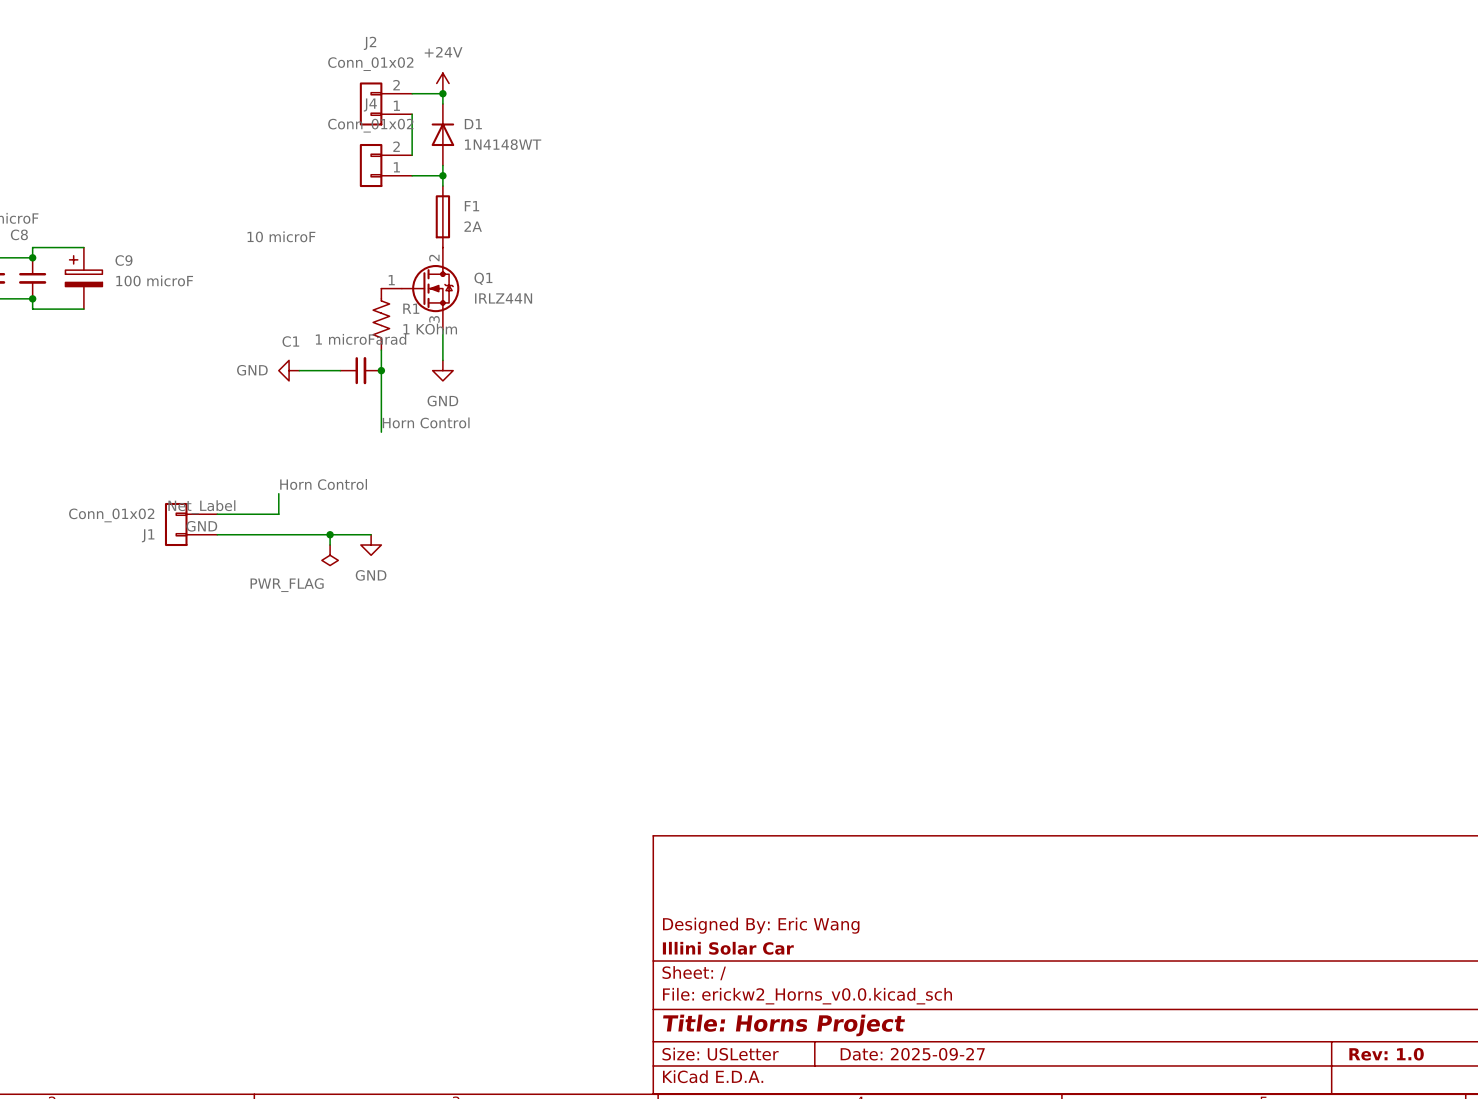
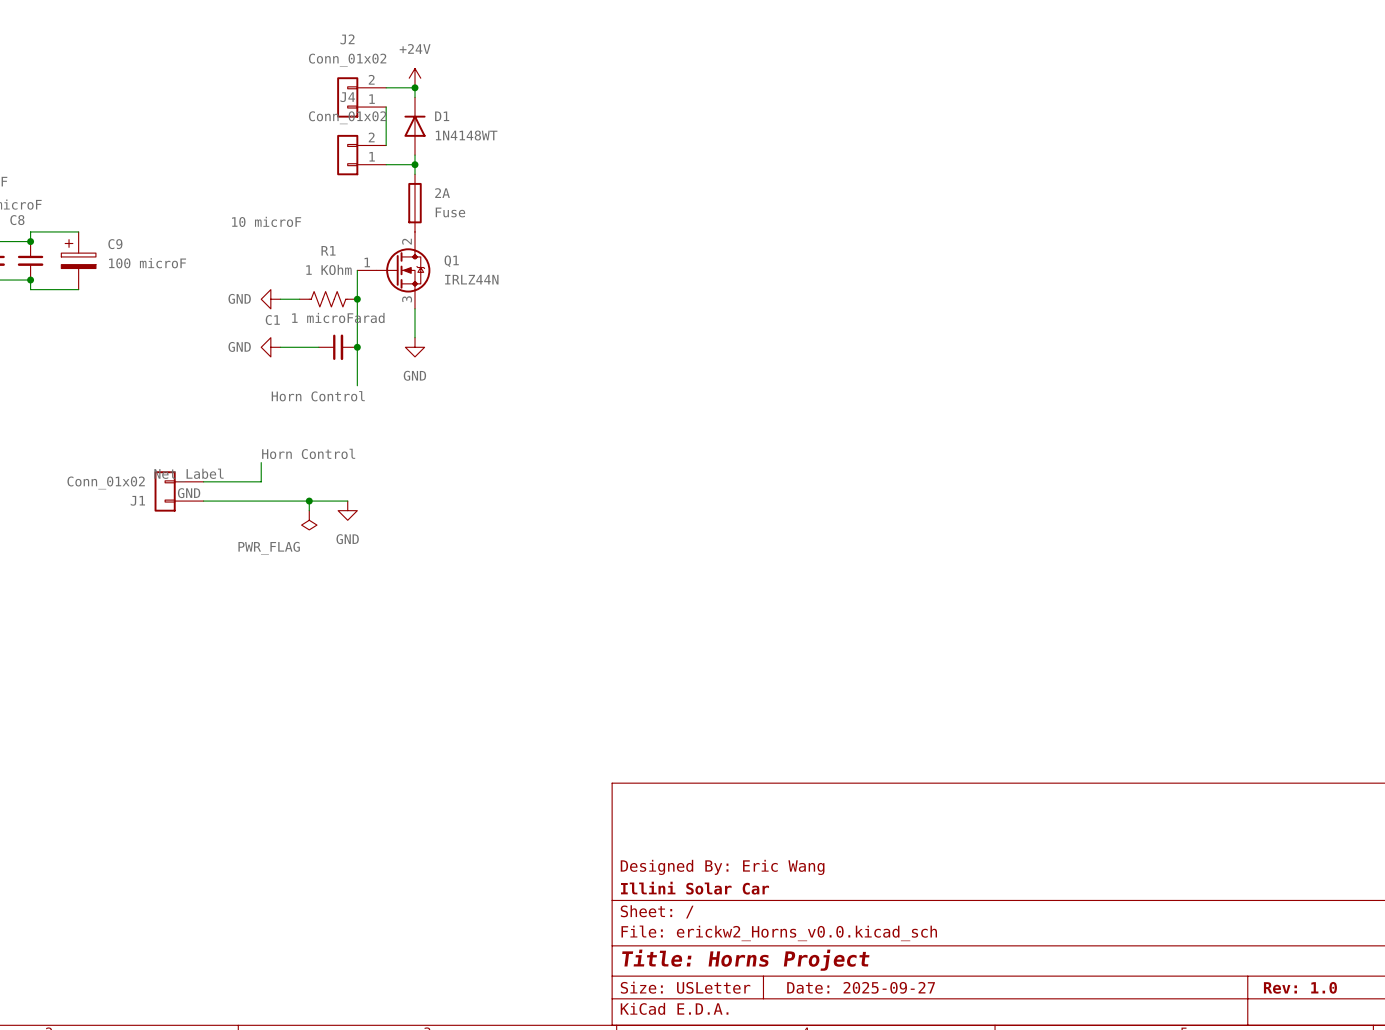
F1 name: F1 (471, 206) -> 2A (442, 193)
F1 value: 2A (473, 226) -> Fuse (450, 212)
R1 name position: R1 (411, 308) -> R1 (328, 250)
power symbol: none -> GND (270, 299)
wire: none -> (280, 299) (299, 299)
R1 rotation: 0° (381, 319) -> 90° clockwise (328, 299)
junction: none -> (357, 299)
R1 value position: 1 KOhm (430, 329) -> 1 KOhm (328, 269)
wire: (381, 411) (381, 432) -> none
label position: Horn Control (426, 422) -> Horn Control (318, 396)

